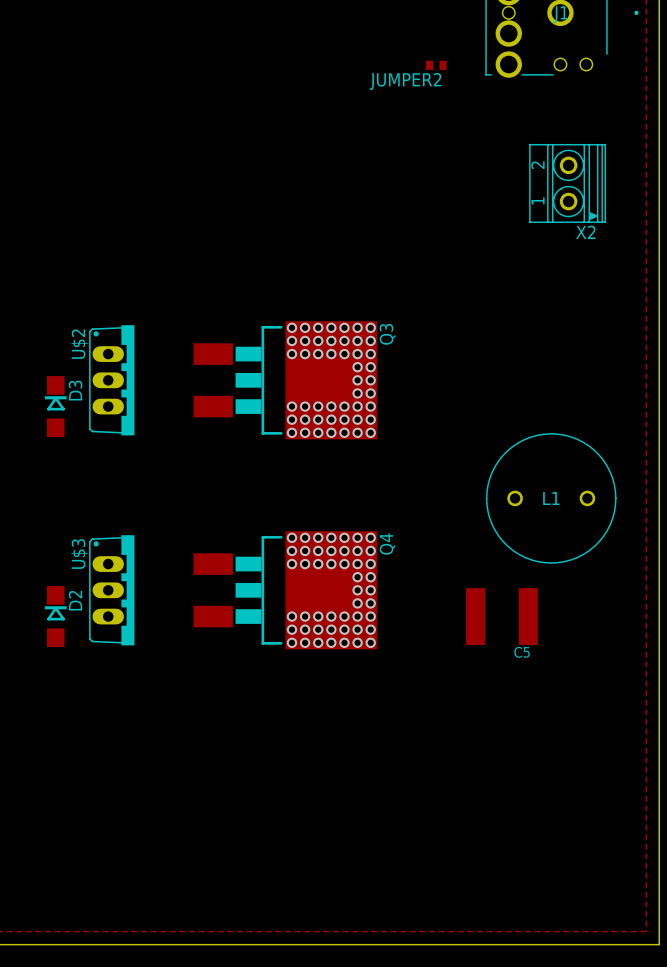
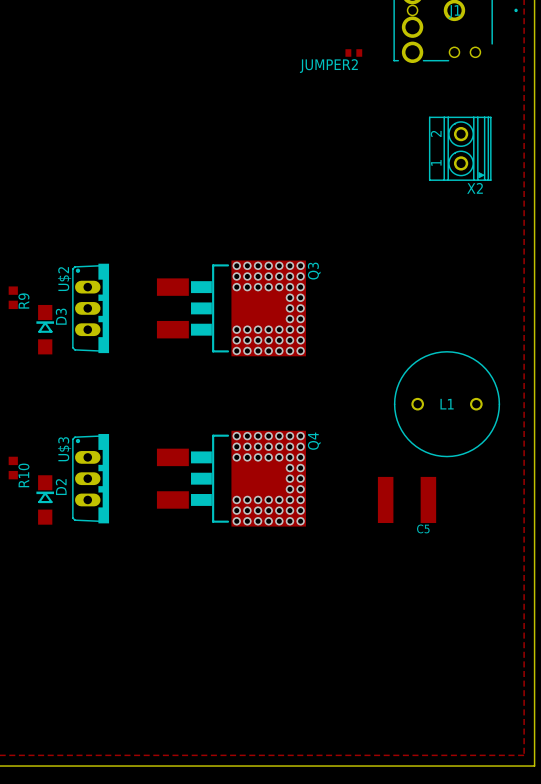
R9: none -> (13, 297)
R10: none -> (13, 468)

